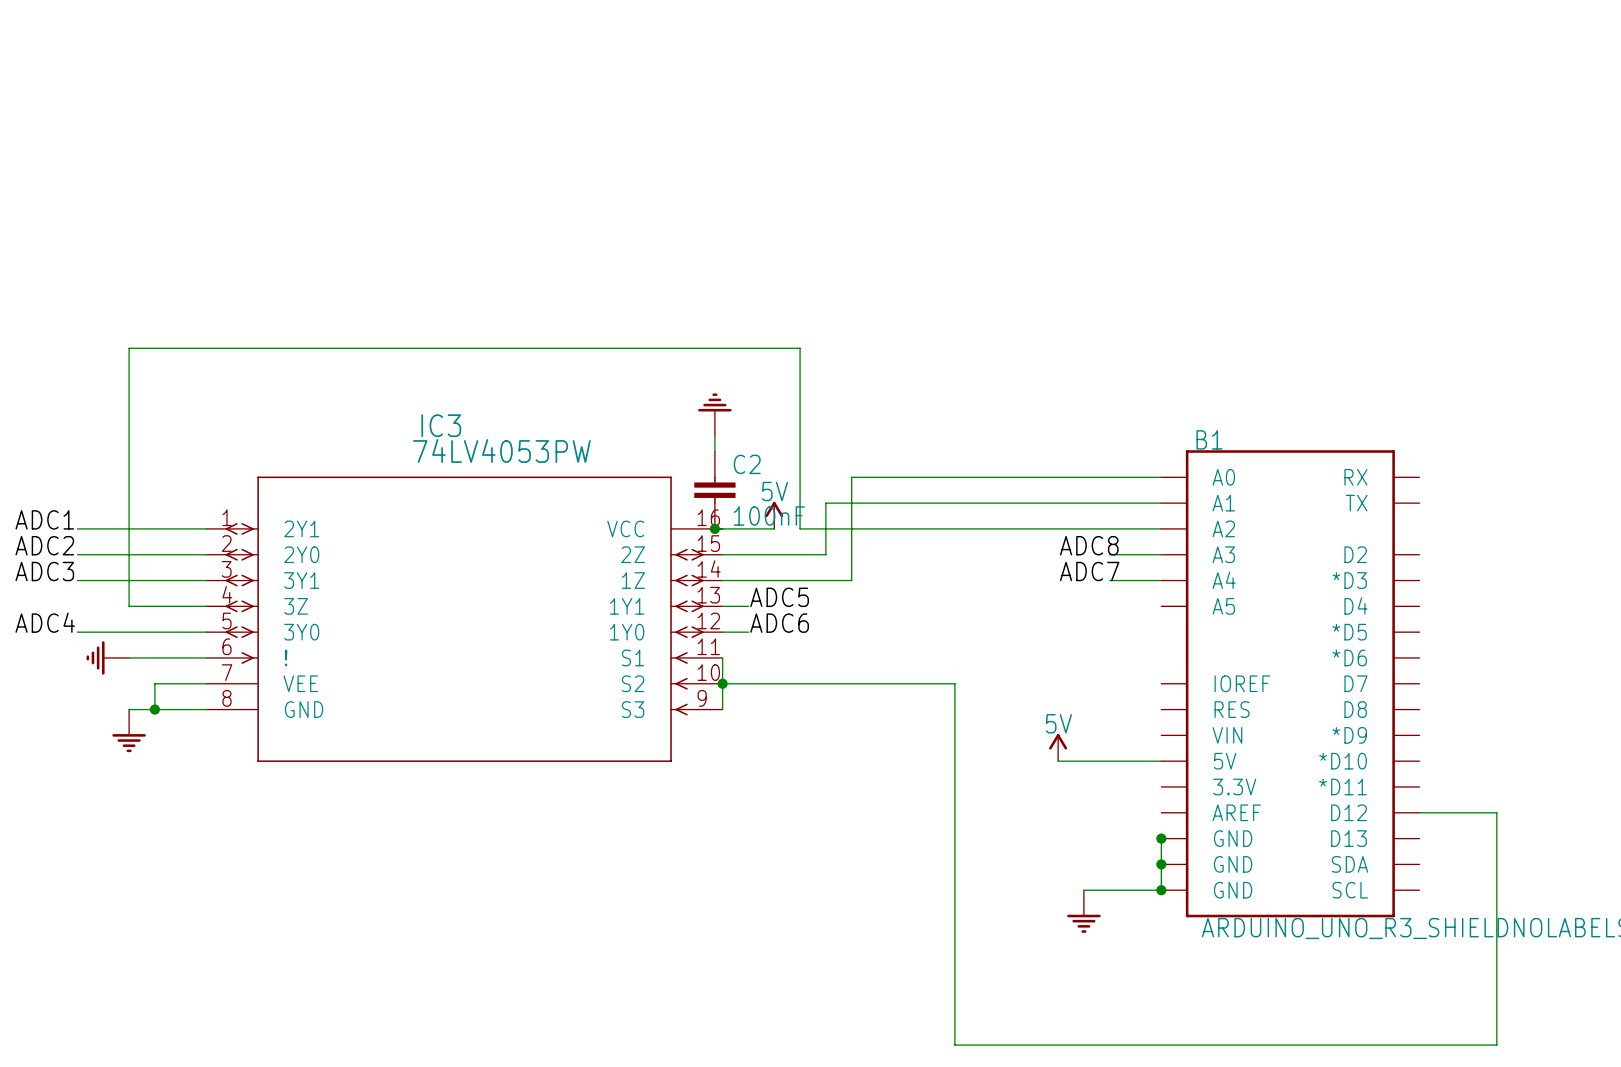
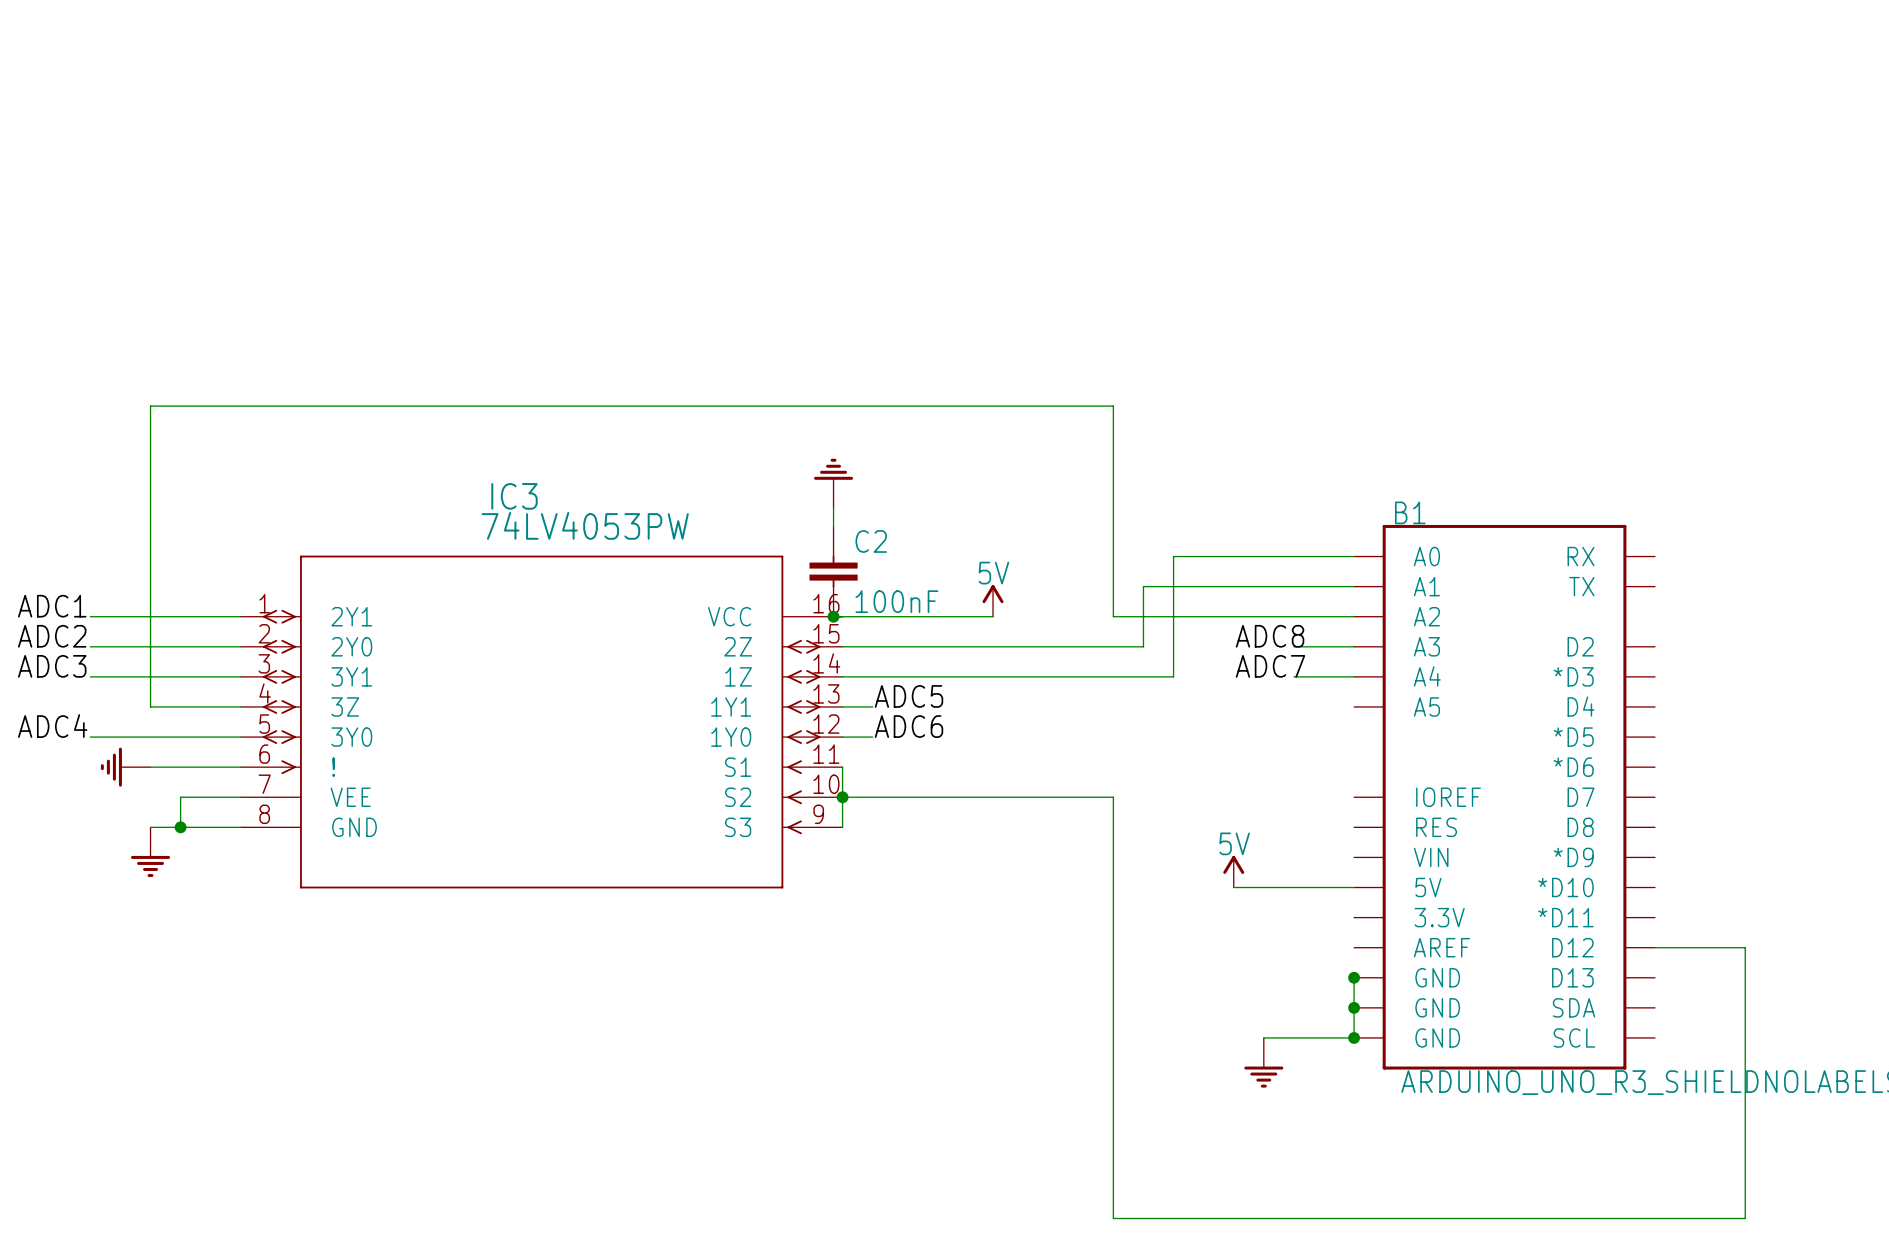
wire: (800, 348) (800, 528) -> (932, 406) (1113, 406) (1113, 616)
wire: (1006, 477) (851, 477) (851, 580) -> (1173, 556) (1173, 676) (993, 676)
wire: (980, 503) (825, 503) (825, 554) -> (1143, 586) (1143, 646) (962, 646)
power symbol position: 5V (774, 515) -> 5V (993, 600)
wire: none -> (902, 616) (932, 616)
wire: (851, 528) (954, 528) -> none

